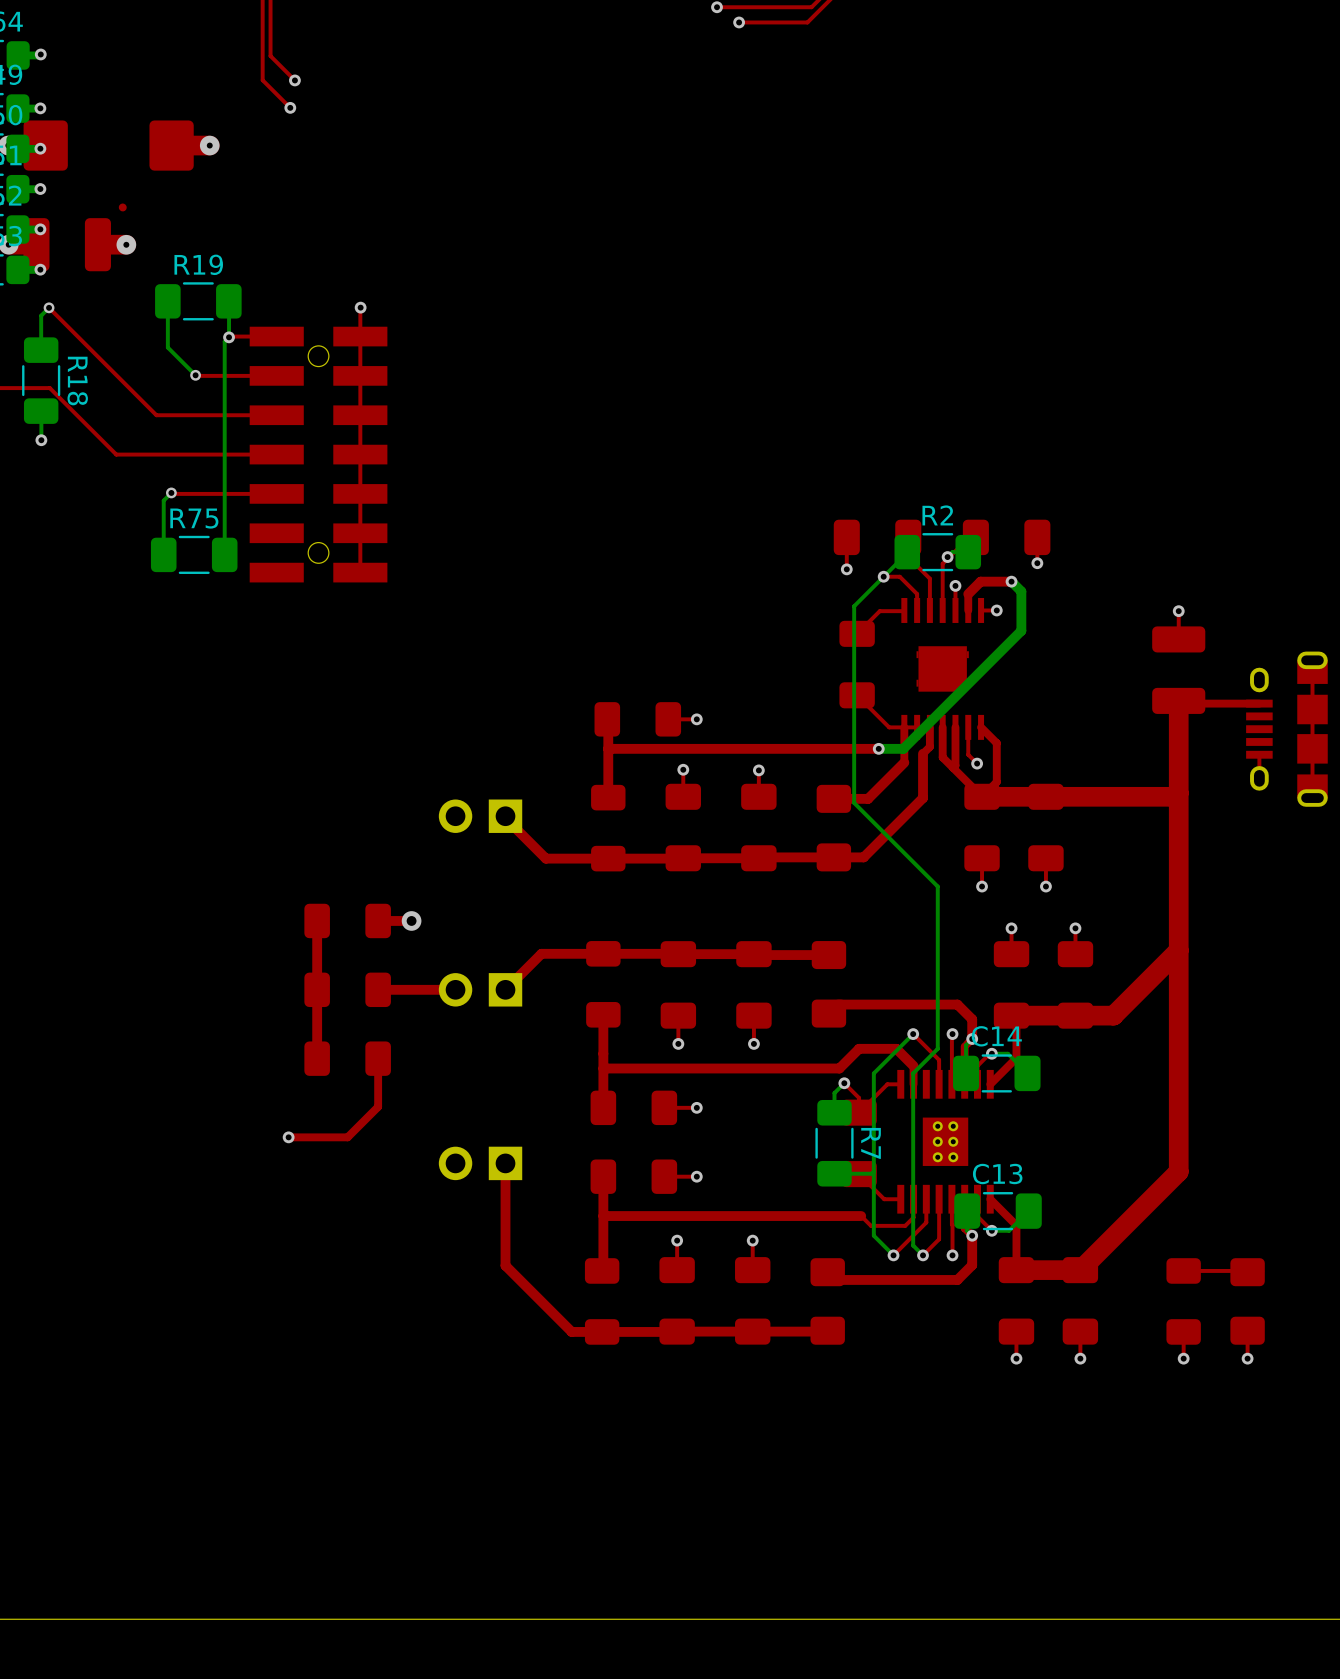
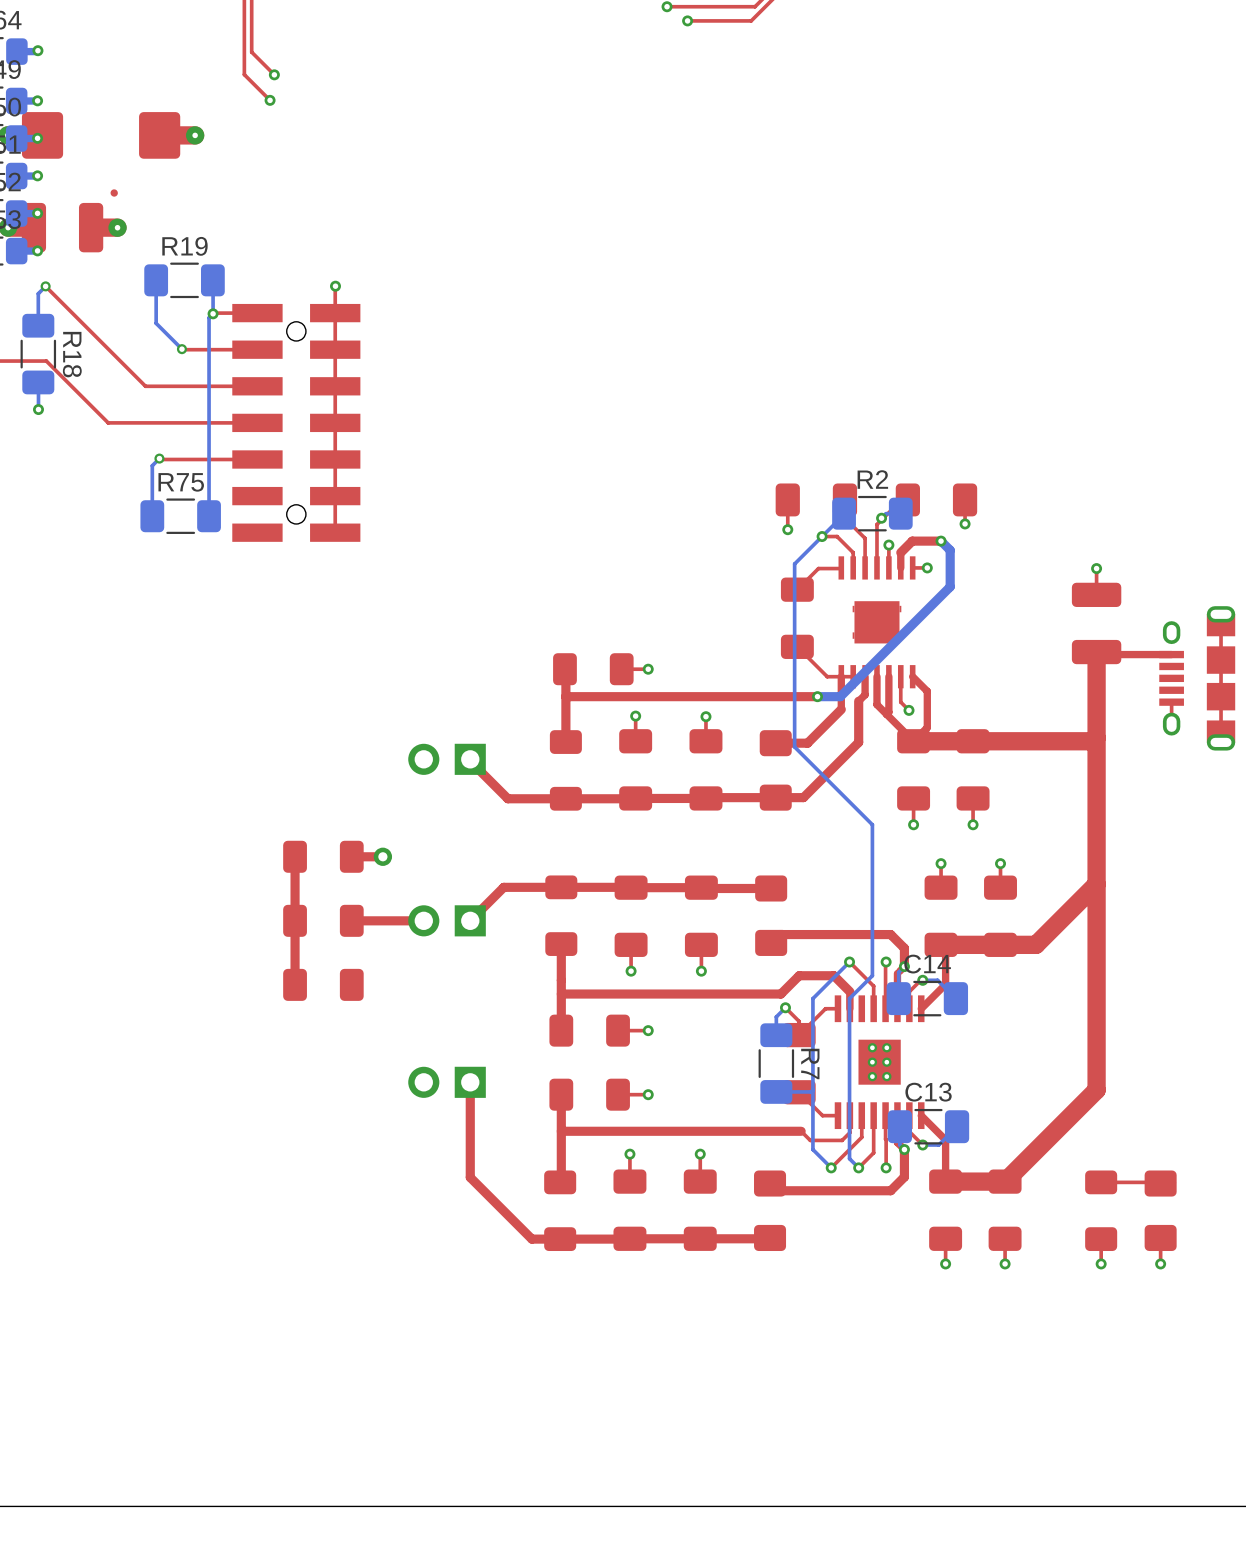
top track: (378, 1058) (378, 1106) (347, 1137) (288, 1137) -> none
via: (288, 1137) -> none

